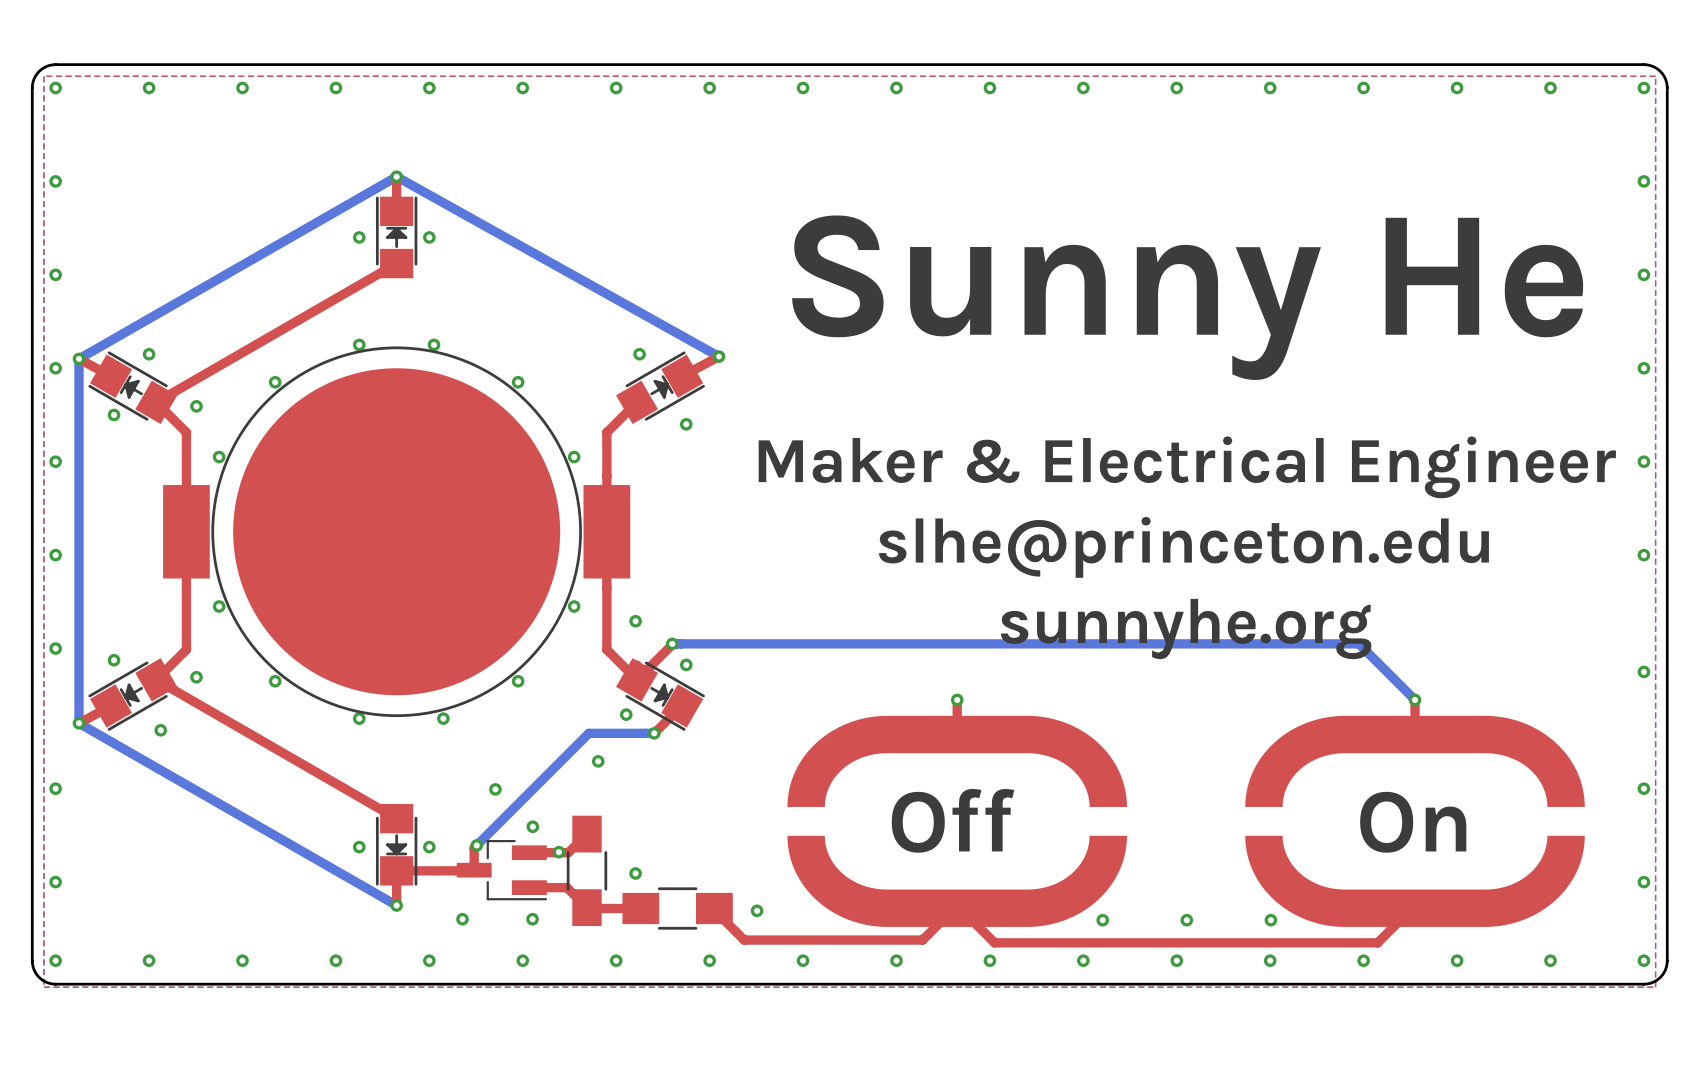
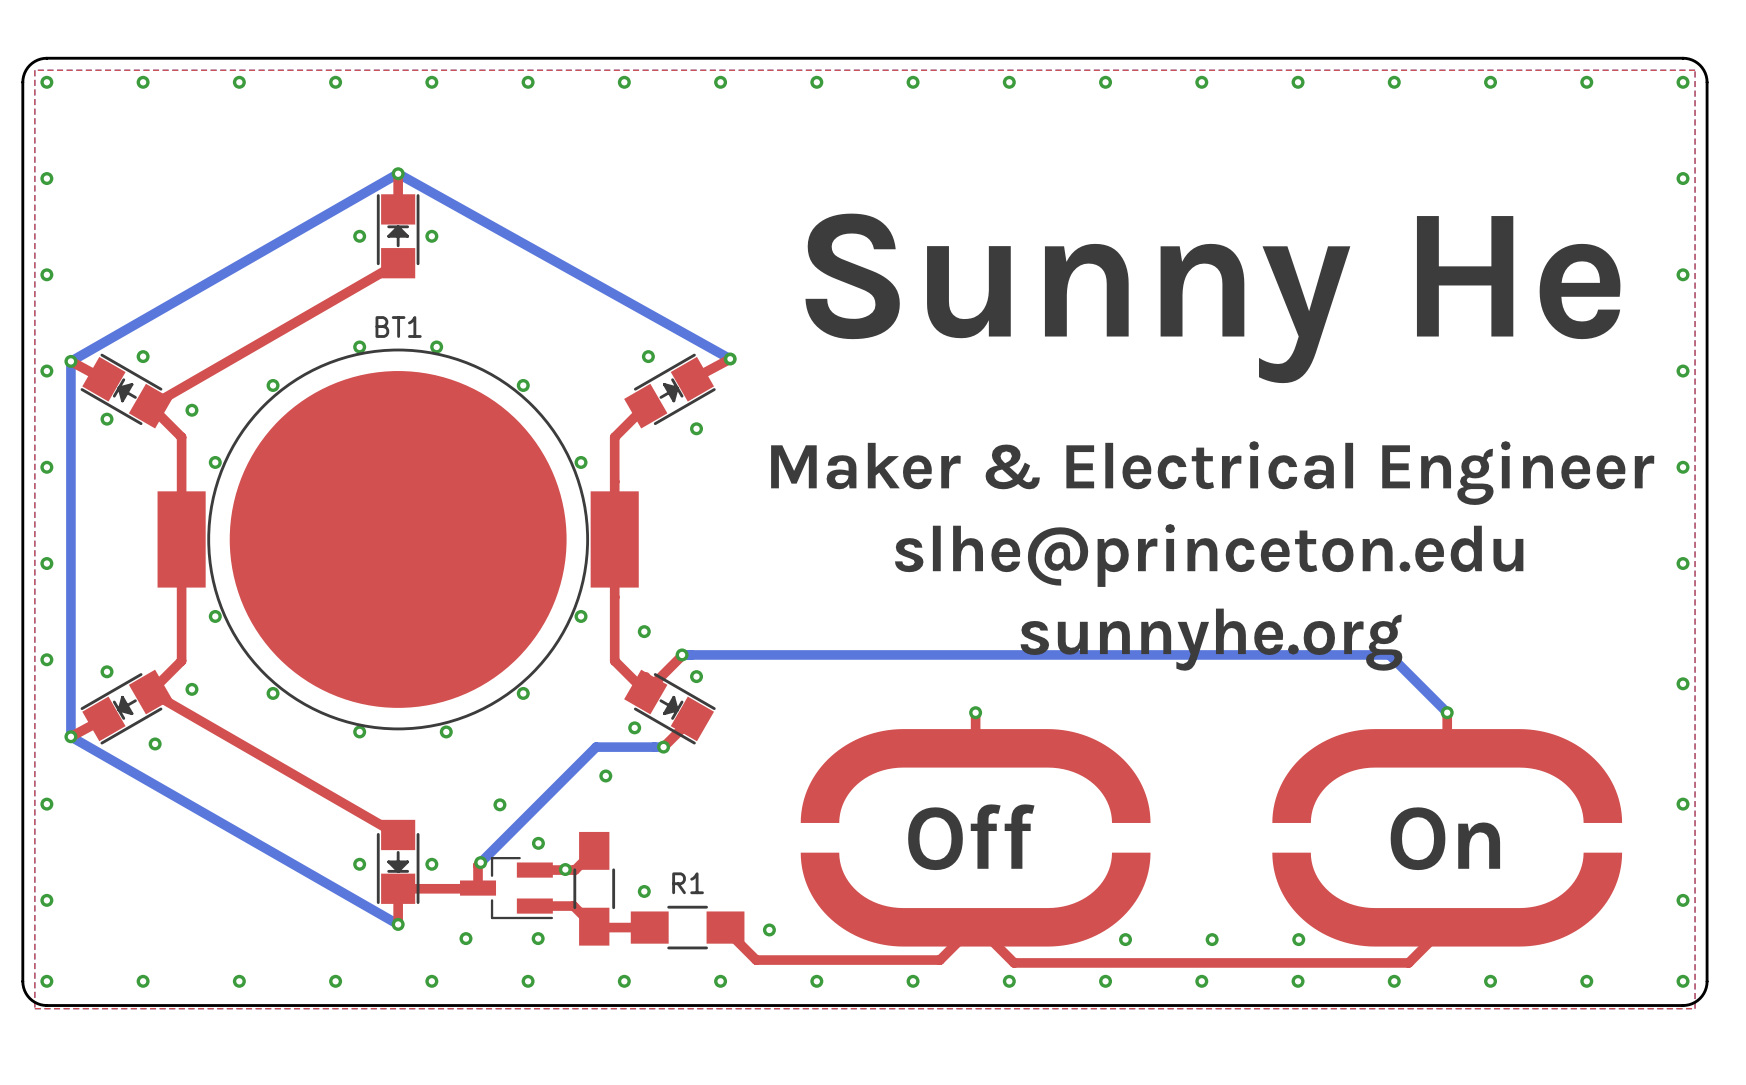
BT1 name: none -> BT1 (398, 327)
R1 name: none -> R1 (688, 883)

